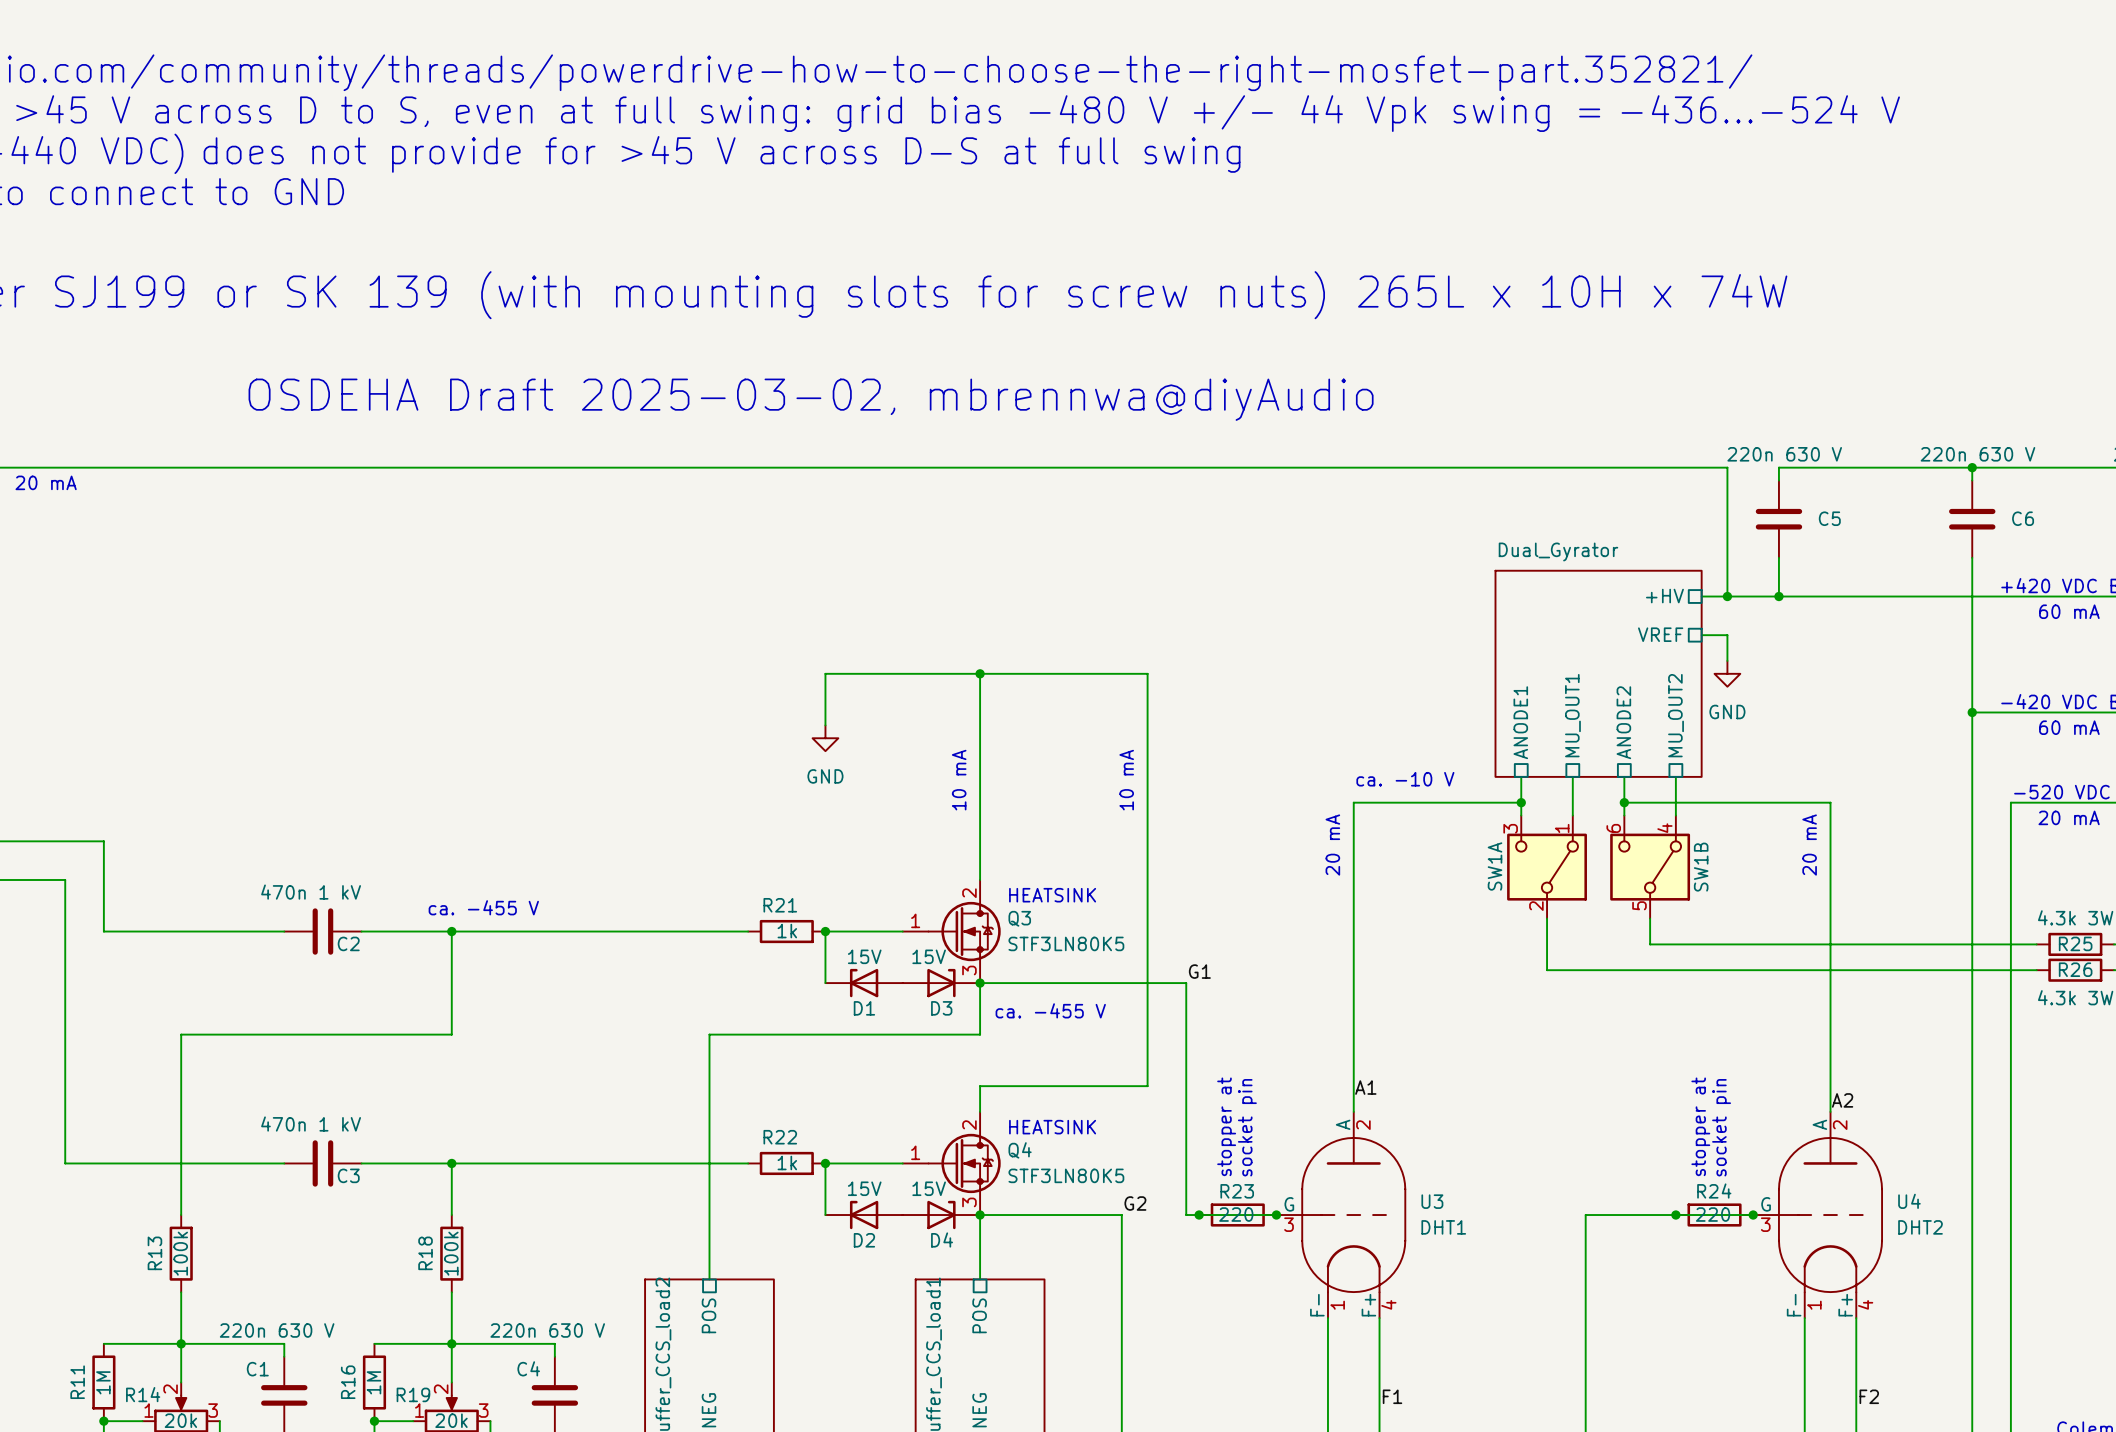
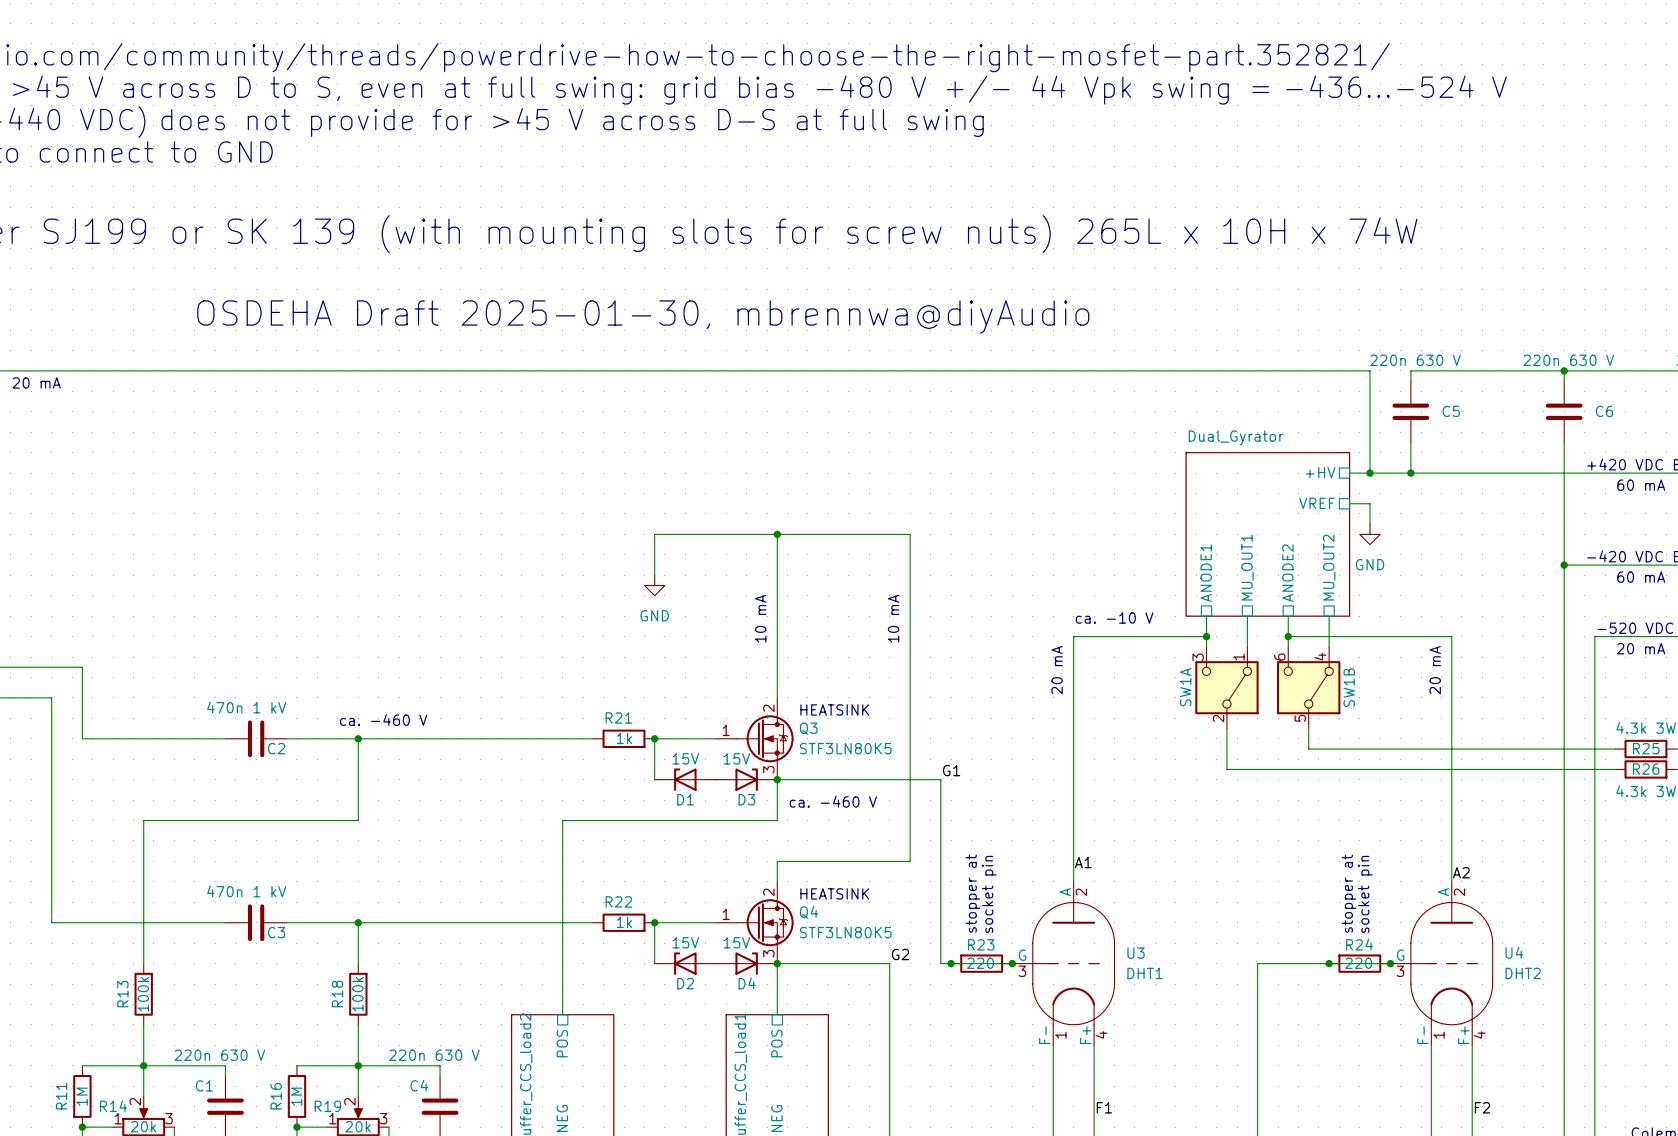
text: OSDEHA Draft 2025-03-02, mbrennwa@diyAudio (811, 399) -> OSDEHA Draft 2025-01-30, mbrennwa@diyAudio (643, 317)
text: ca. -455 V (483, 907) -> ca. -460 V (383, 719)
text: ca. -455 V (1050, 1010) -> ca. -460 V (833, 801)

